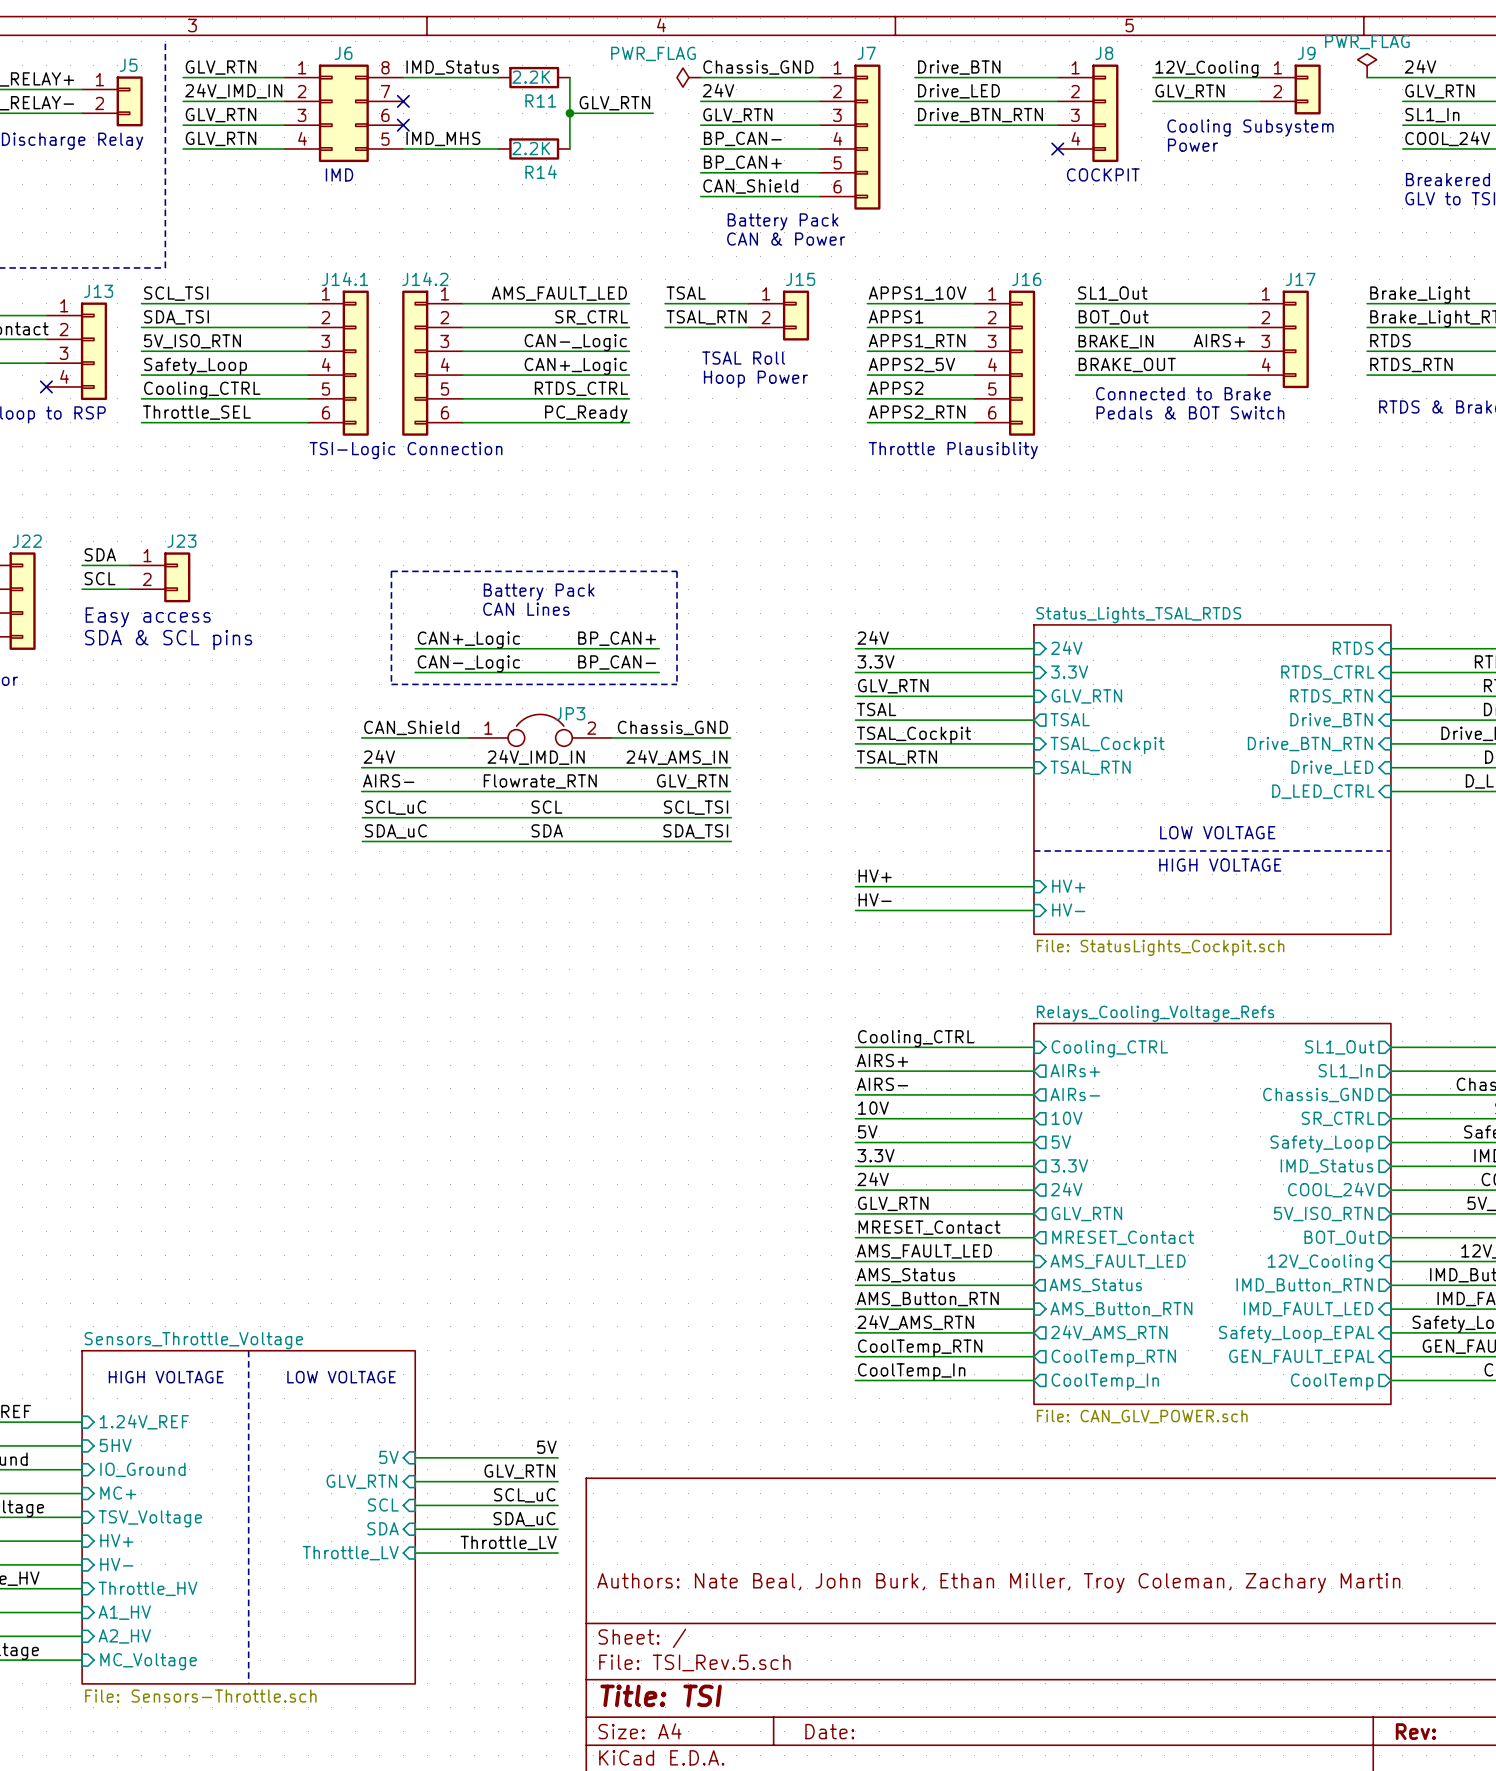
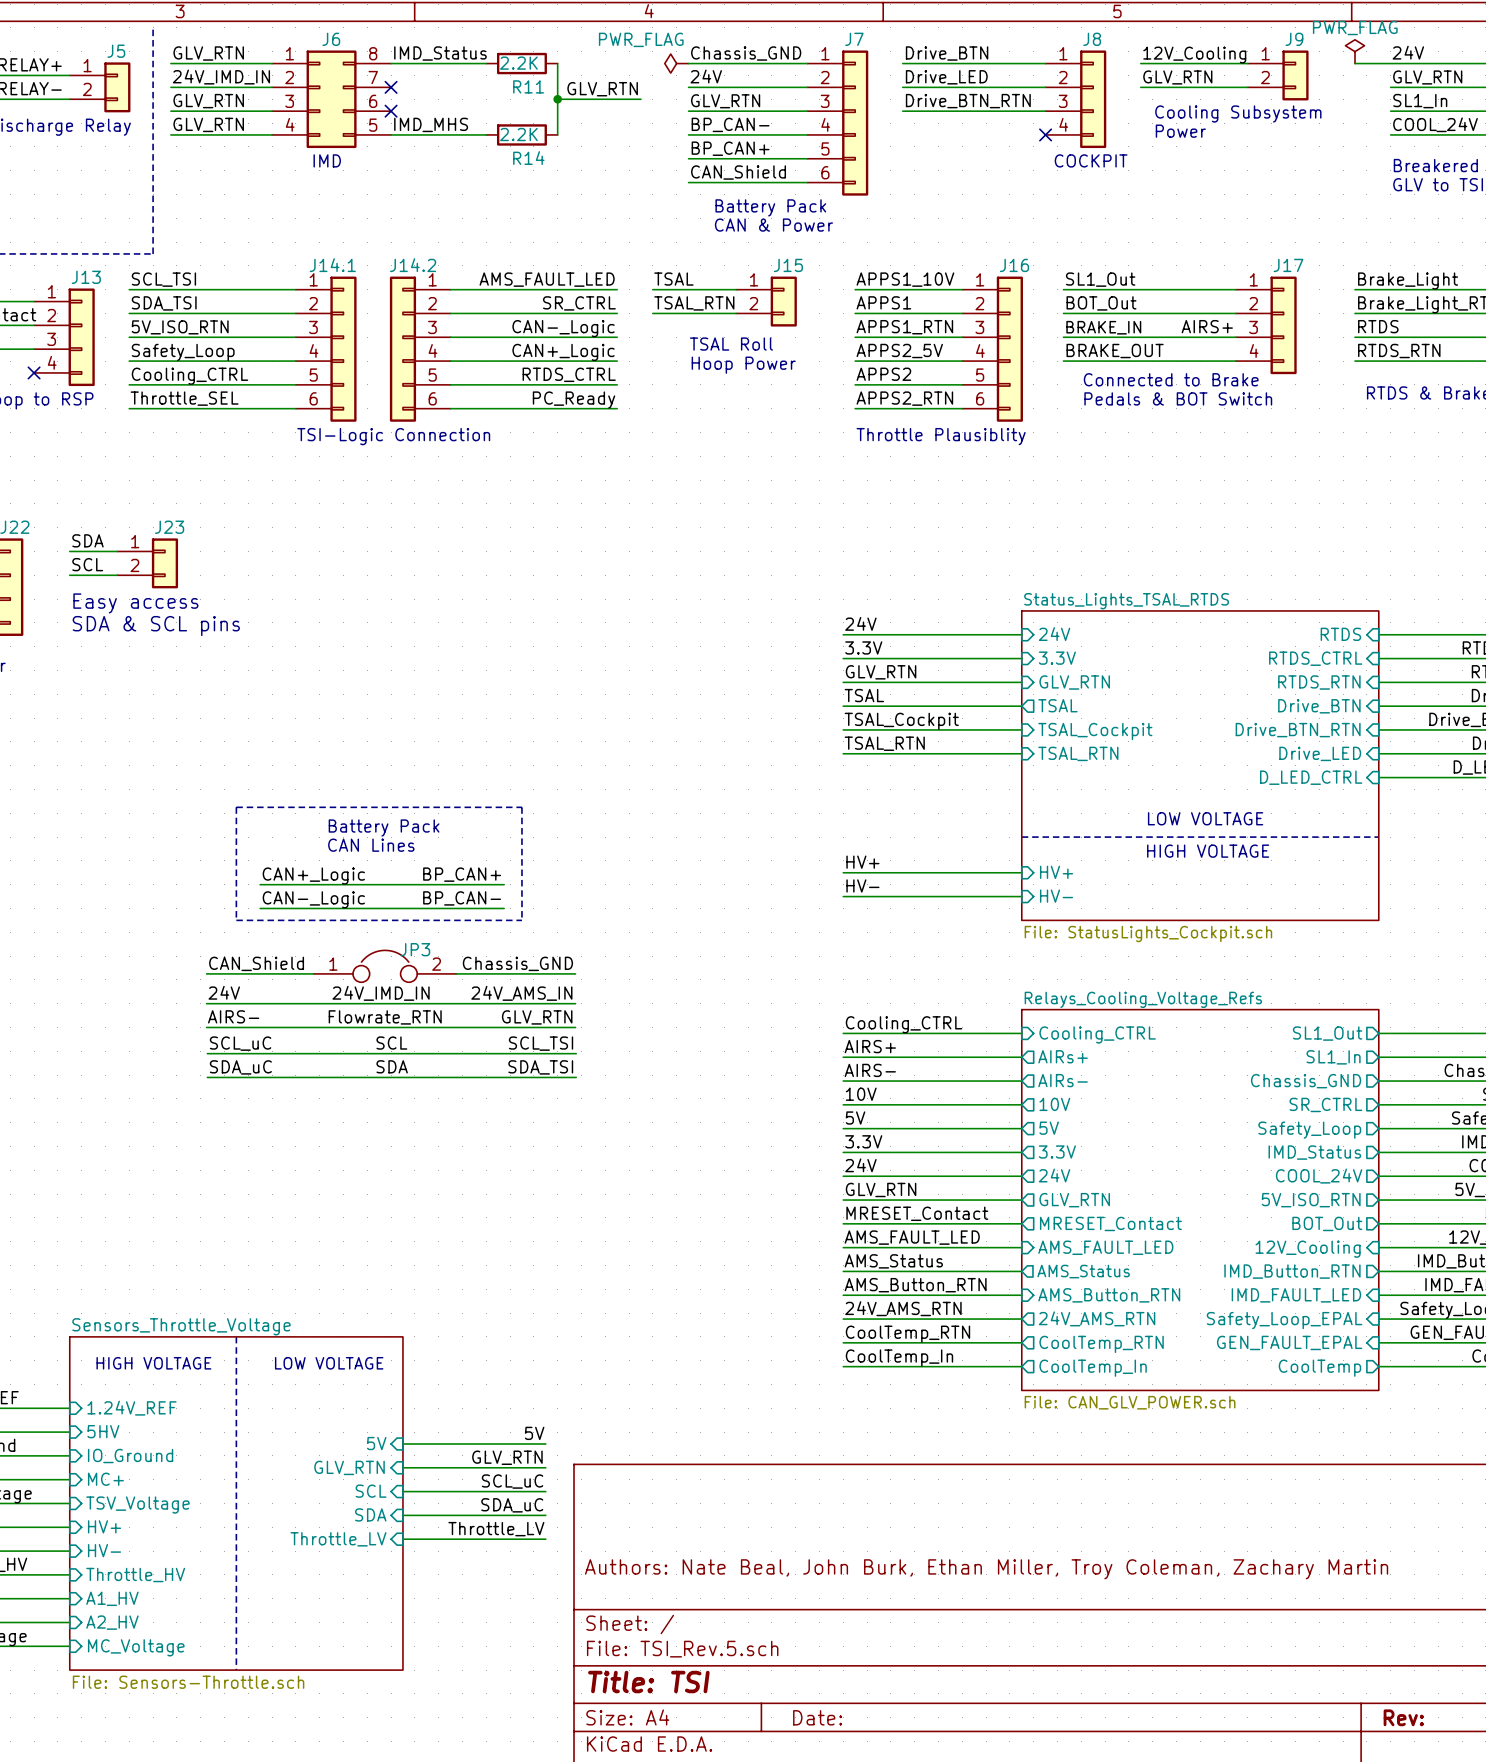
line: (391, 571) (677, 571) (677, 684) (391, 684) (391, 571) -> none
text: Battery Pack (539, 592) -> none
text: CAN Lines (526, 609) -> none
label: BP_CAN+ (617, 638) -> none
label: CAN+_Logic (468, 640) -> none
wire: (415, 648) (659, 648) -> none
label: BP_CAN- (617, 662) -> none
label: CAN-_Logic (468, 663) -> none
wire: (415, 672) (659, 672) -> none
label: CAN_Shield (411, 727) -> none
label: Chassis_GND (672, 727) -> none
JP3 position: (540, 730) -> (385, 966)
wire: (361, 737) (468, 737) -> none
wire: (611, 737) (730, 737) -> none
label: 24V (379, 756) -> none
label: 24V_IMD_IN (536, 757) -> none
label: 24V_AMS_IN (676, 757) -> none
wire: (361, 767) (730, 767) -> none
label: AIRS- (388, 780) -> none
label: Flowrate_RTN (540, 781) -> none
label: GLV_RTN (692, 781) -> none
wire: (361, 791) (730, 791) -> none
label: SCL_uC (395, 807) -> none
label: SCL (546, 807) -> none
label: SCL_TSI (696, 807) -> none
wire: (362, 817) (731, 817) -> none
line: none -> (236, 807) (521, 807) (521, 920) (236, 920) (236, 807)
label: SDA (547, 830) -> none
label: SDA_uC (395, 831) -> none
label: SDA_TSI (695, 831) -> none
wire: (362, 841) (731, 841) -> (206, 1003) (575, 1003)
text: none -> Battery Pack (384, 828)
text: none -> CAN Lines (371, 845)
label: none -> BP_CAN+ (462, 874)
label: none -> CAN+_Logic (313, 876)
wire: none -> (260, 884) (504, 884)
label: none -> BP_CAN- (462, 898)
label: none -> CAN-_Logic (313, 899)
wire: none -> (260, 908) (504, 908)
label: none -> CAN_Shield (256, 963)
label: none -> Chassis_GND (517, 963)
wire: none -> (206, 973) (313, 973)
wire: none -> (456, 973) (575, 973)
label: none -> 24V (224, 992)
label: none -> 24V_IMD_IN (381, 993)
label: none -> 24V_AMS_IN (521, 993)
label: none -> AIRS- (233, 1016)
label: none -> Flowrate_RTN (385, 1017)
label: none -> GLV_RTN (537, 1017)
wire: none -> (206, 1027) (575, 1027)
label: none -> SCL (391, 1043)
label: none -> SCL_uC (240, 1043)
label: none -> SCL_TSI (541, 1043)
wire: none -> (207, 1053) (576, 1053)
label: none -> SDA (392, 1066)
label: none -> SDA_uC (240, 1067)
label: none -> SDA_TSI (540, 1067)
wire: none -> (207, 1077) (576, 1077)

